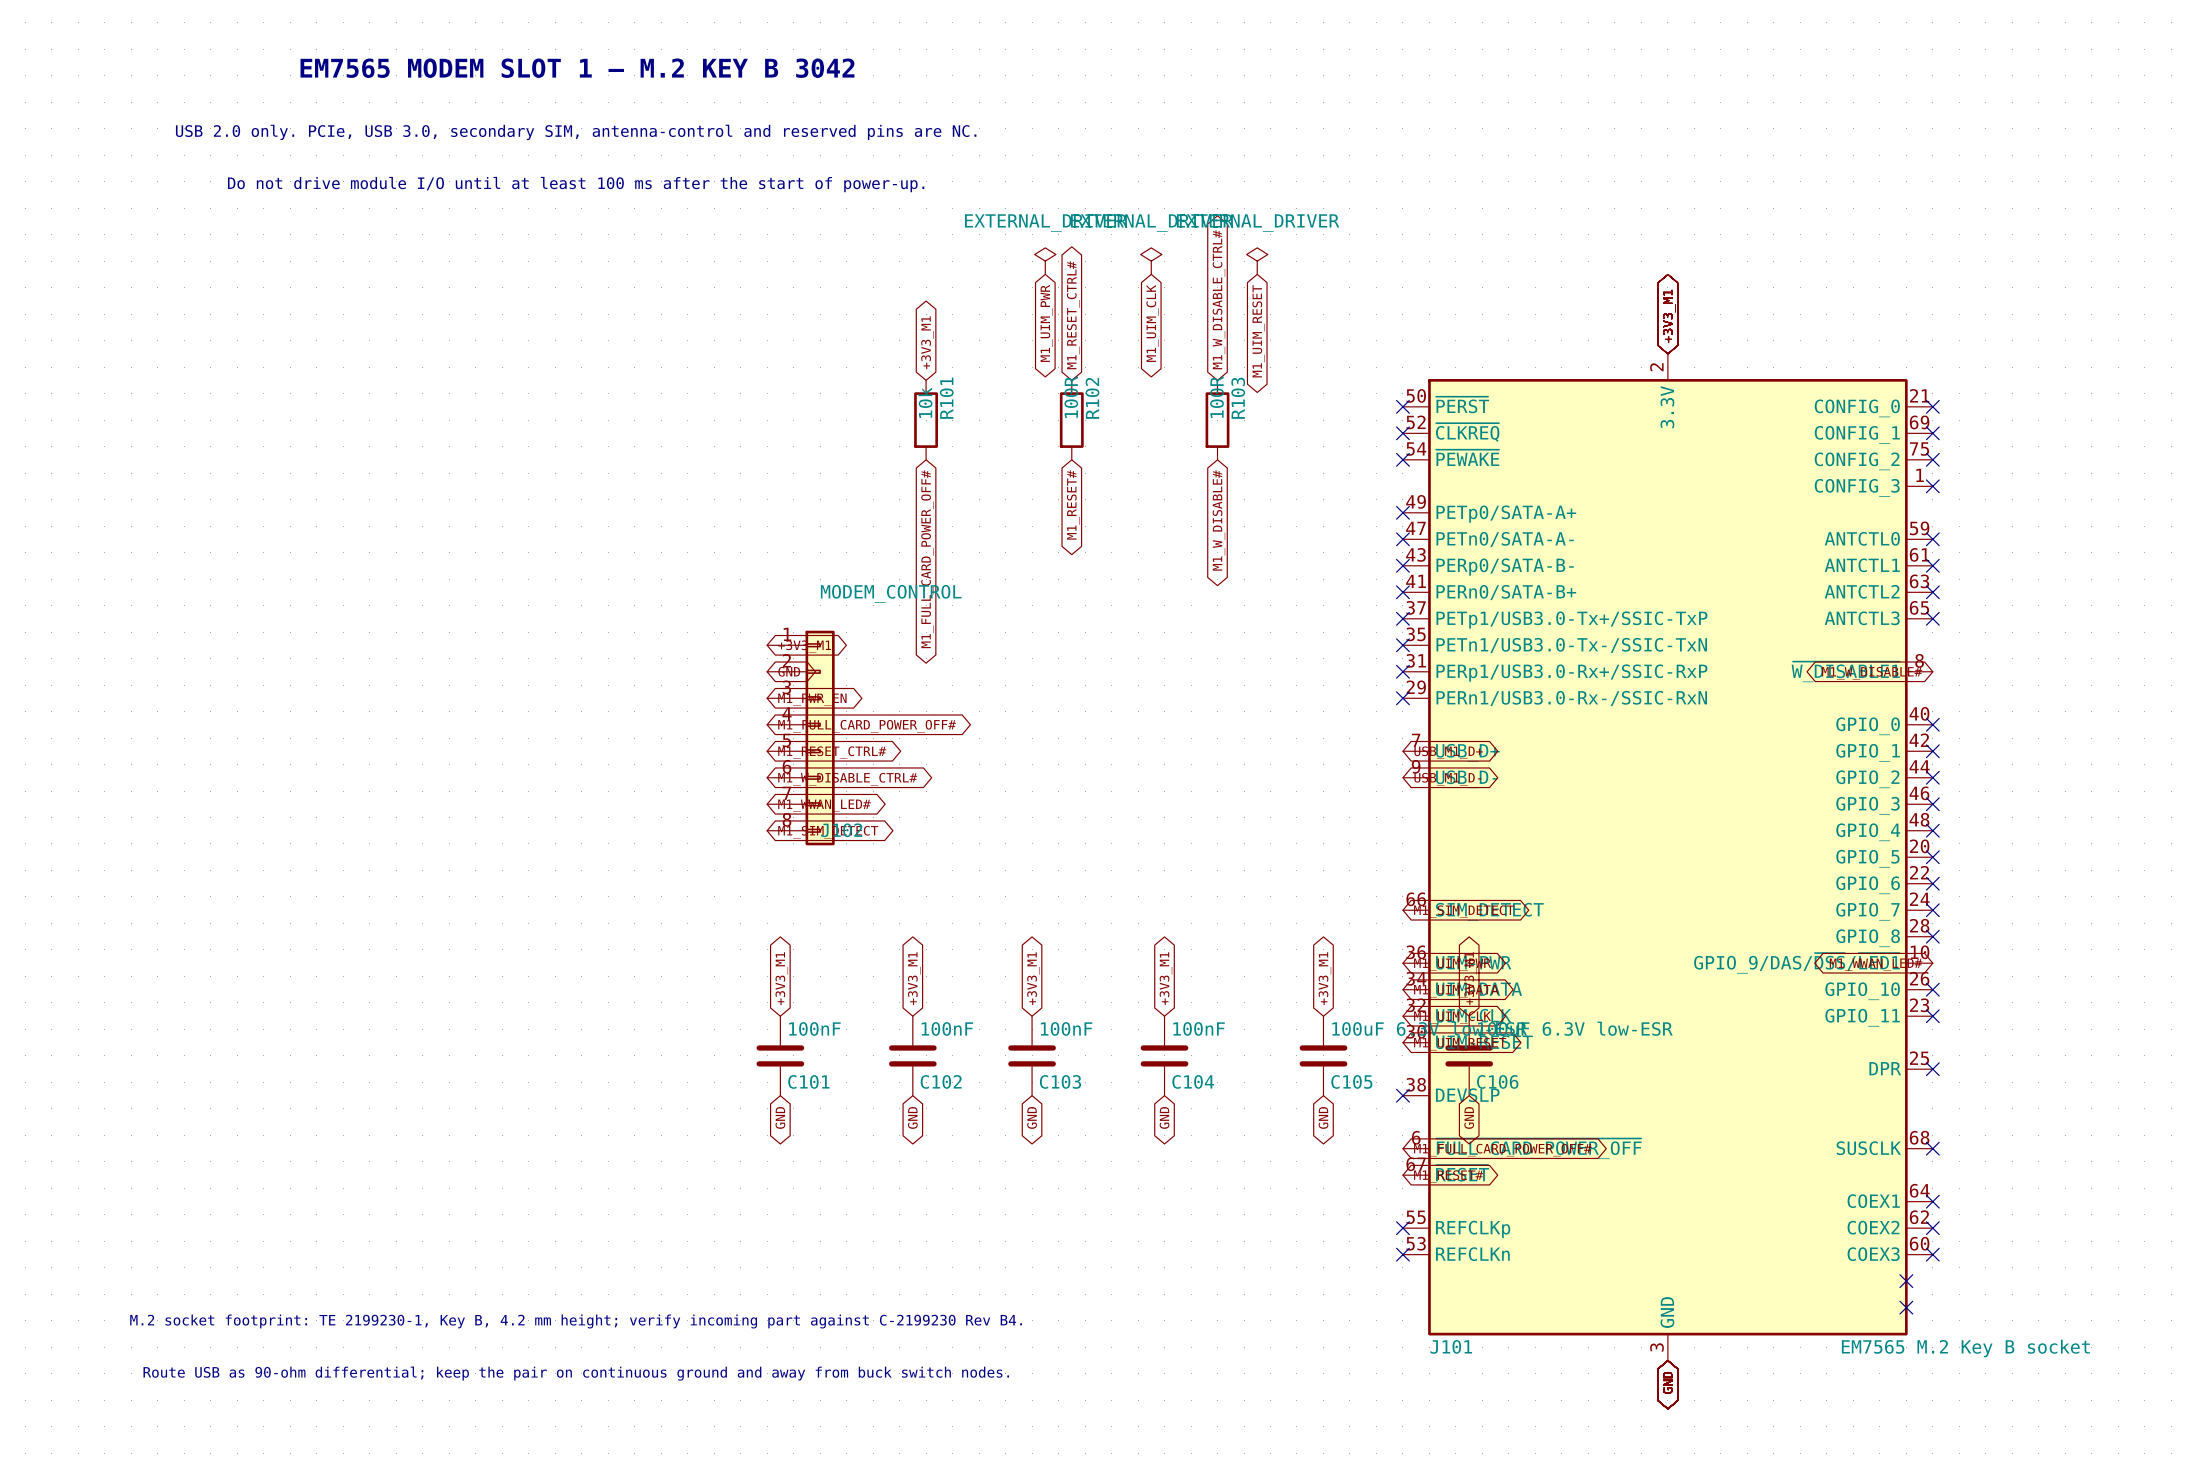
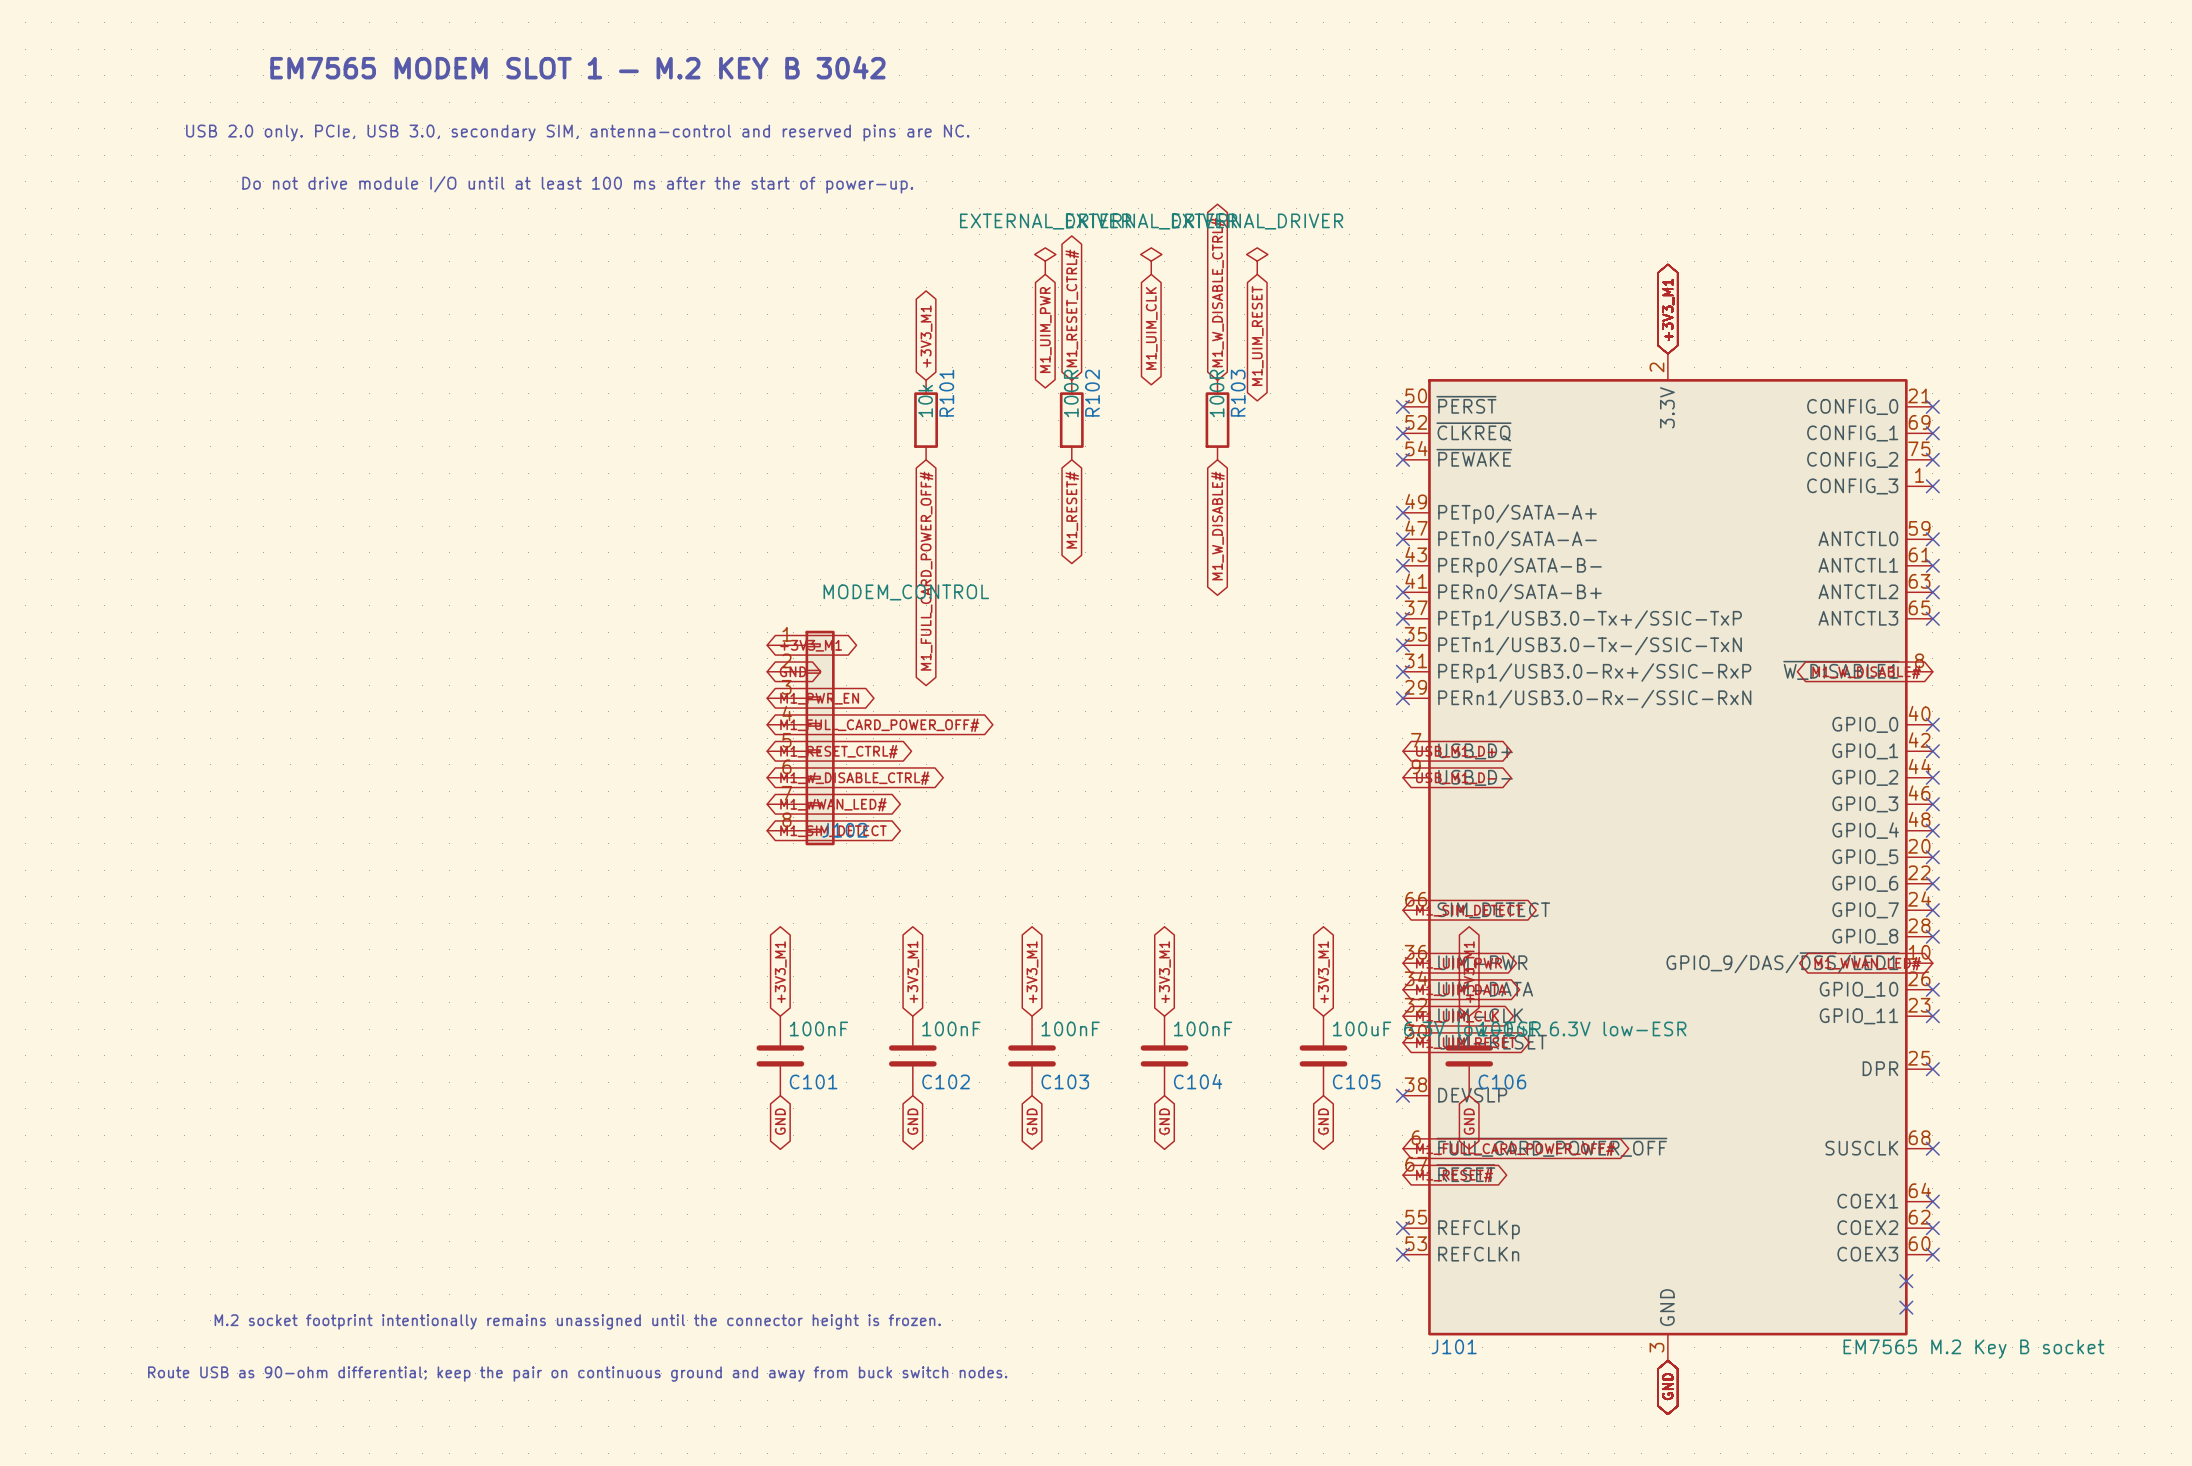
text: M.2 socket footprint: TE 2199230-1, Key B, 4.2 mm height; verify incoming part against C-2199230 Rev B4. (576, 1321) -> M.2 socket footprint intentionally remains unassigned until the connector height is frozen. (577, 1321)

